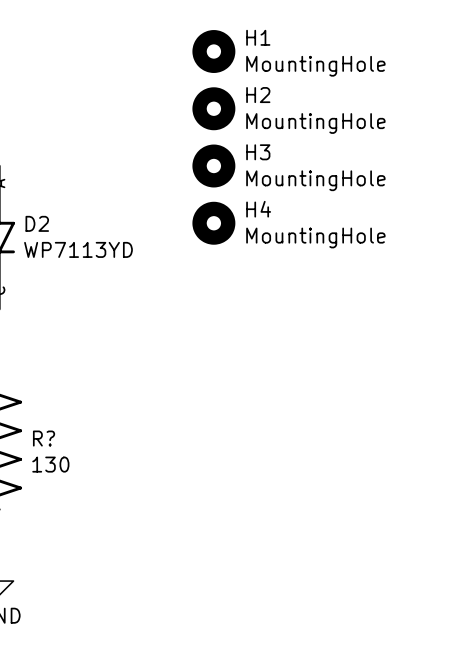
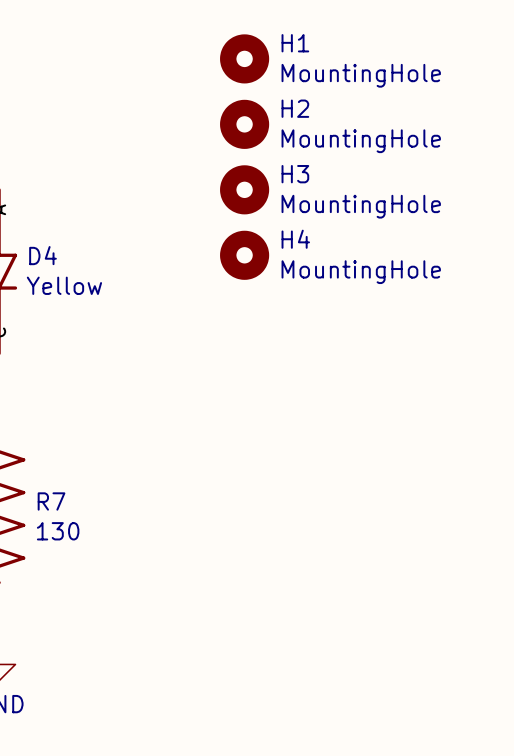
D2 name: D2 (37, 223) -> D4 (43, 255)
D2 value: WP7113YD (78, 249) -> Yellow (64, 285)
R? name: R? (44, 438) -> R7 (51, 501)

